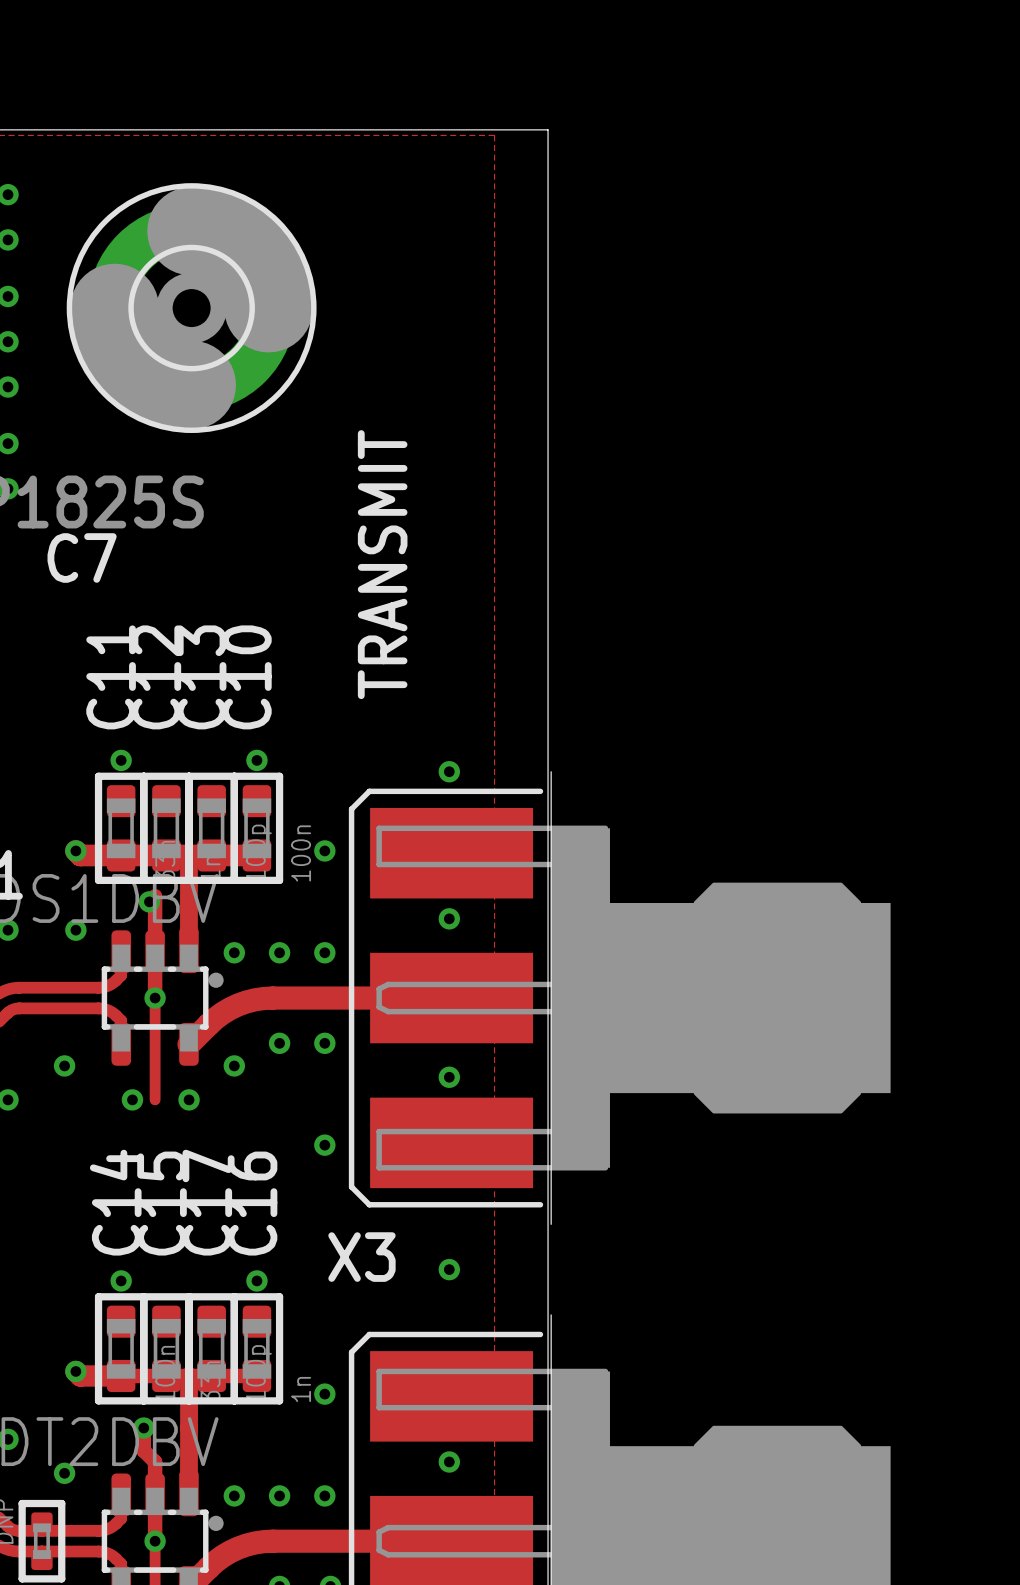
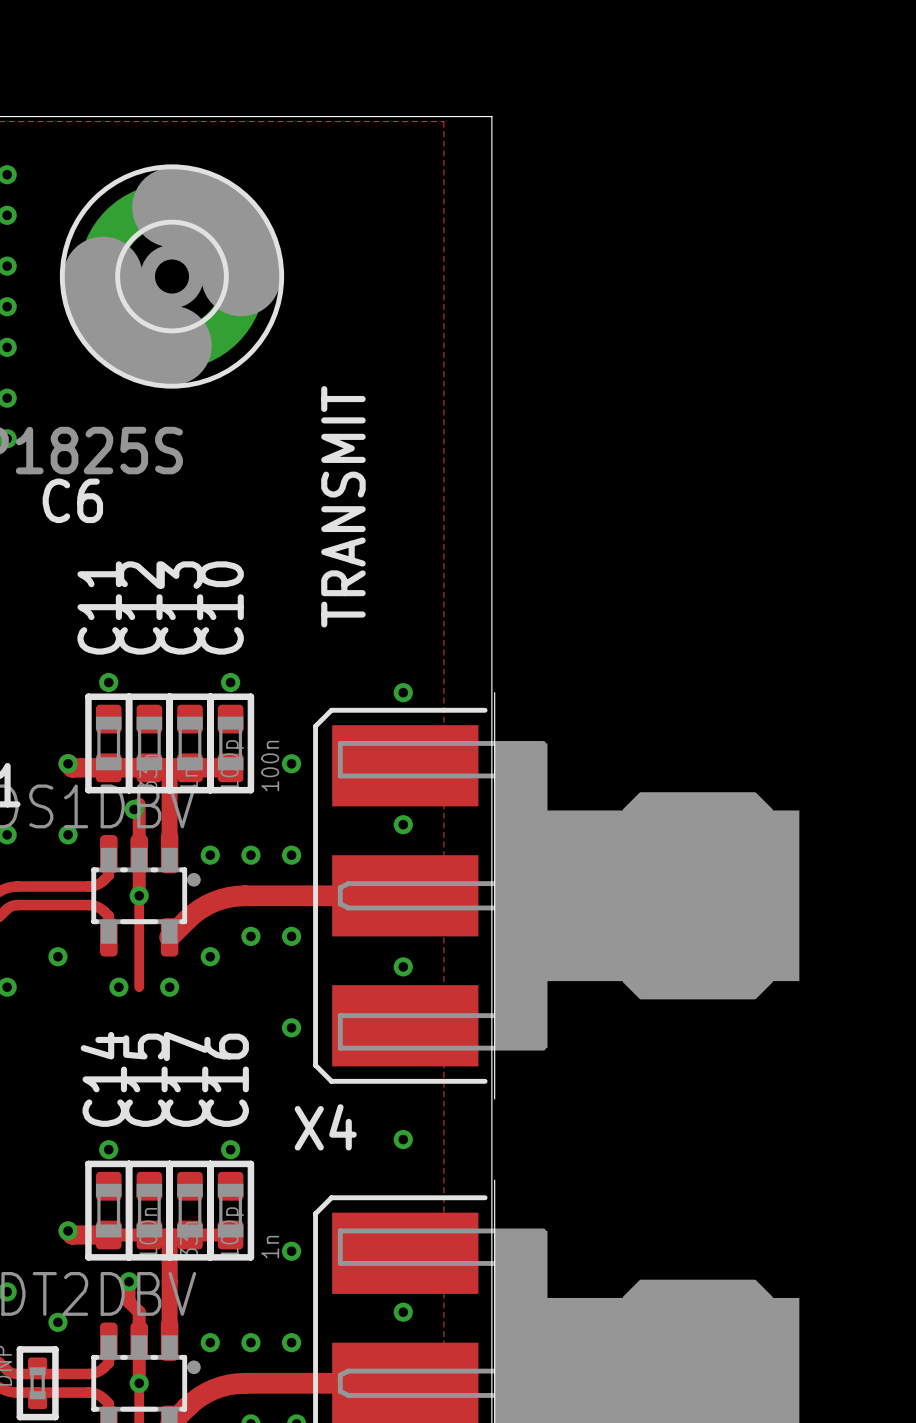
C7 name: C7 (82, 557) -> C6 (72, 500)
X3 name: X3 (361, 1257) -> X4 (325, 1127)

